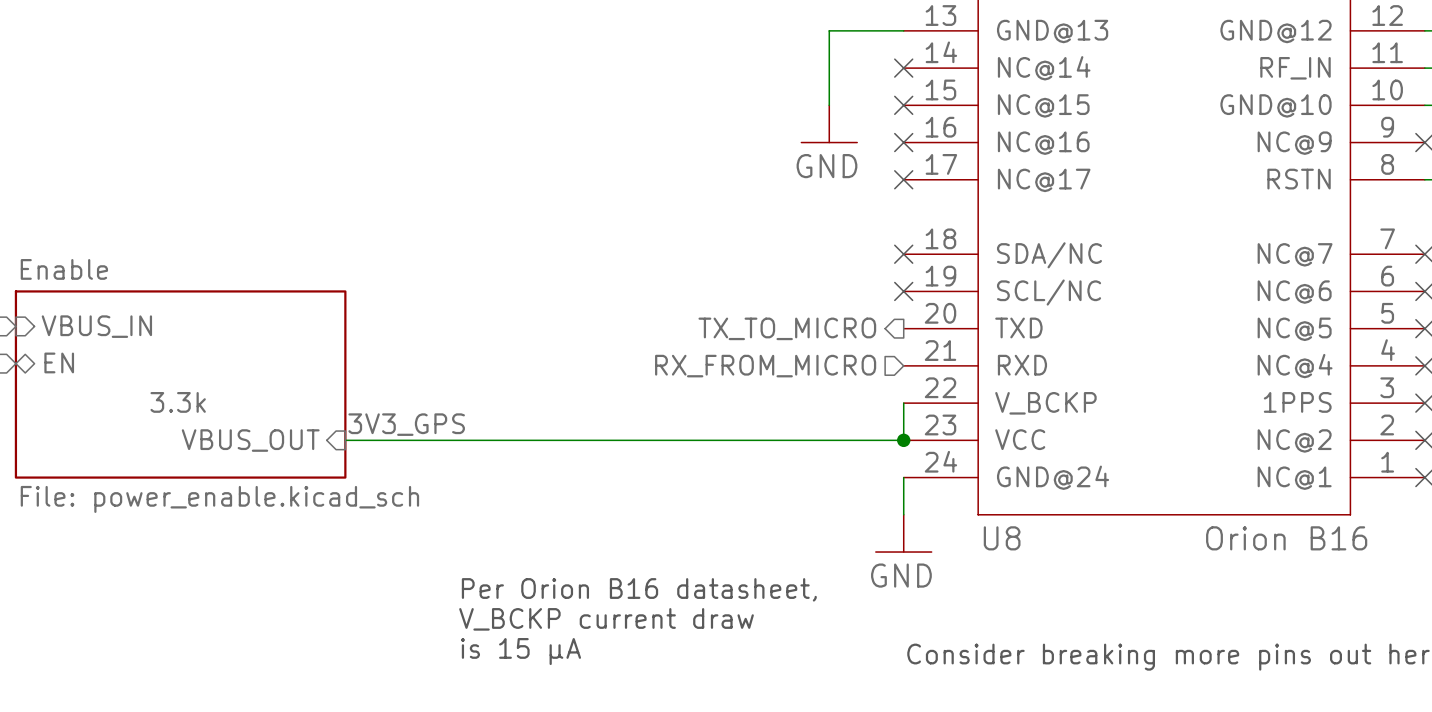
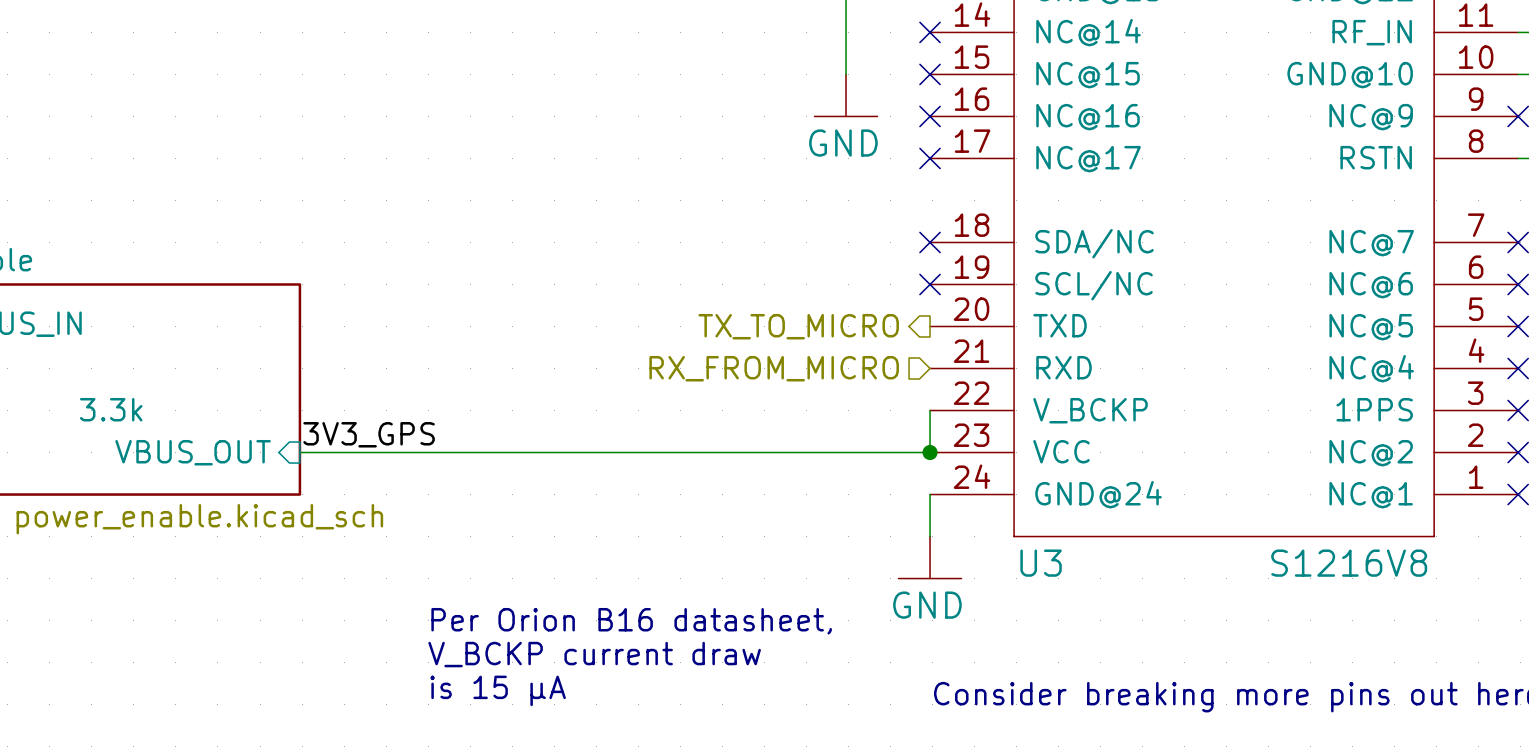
U8 name: U8 (1002, 538) -> U3 (1041, 563)
U8 value: Orion B16 (1286, 538) -> S1216V8 (1349, 563)

